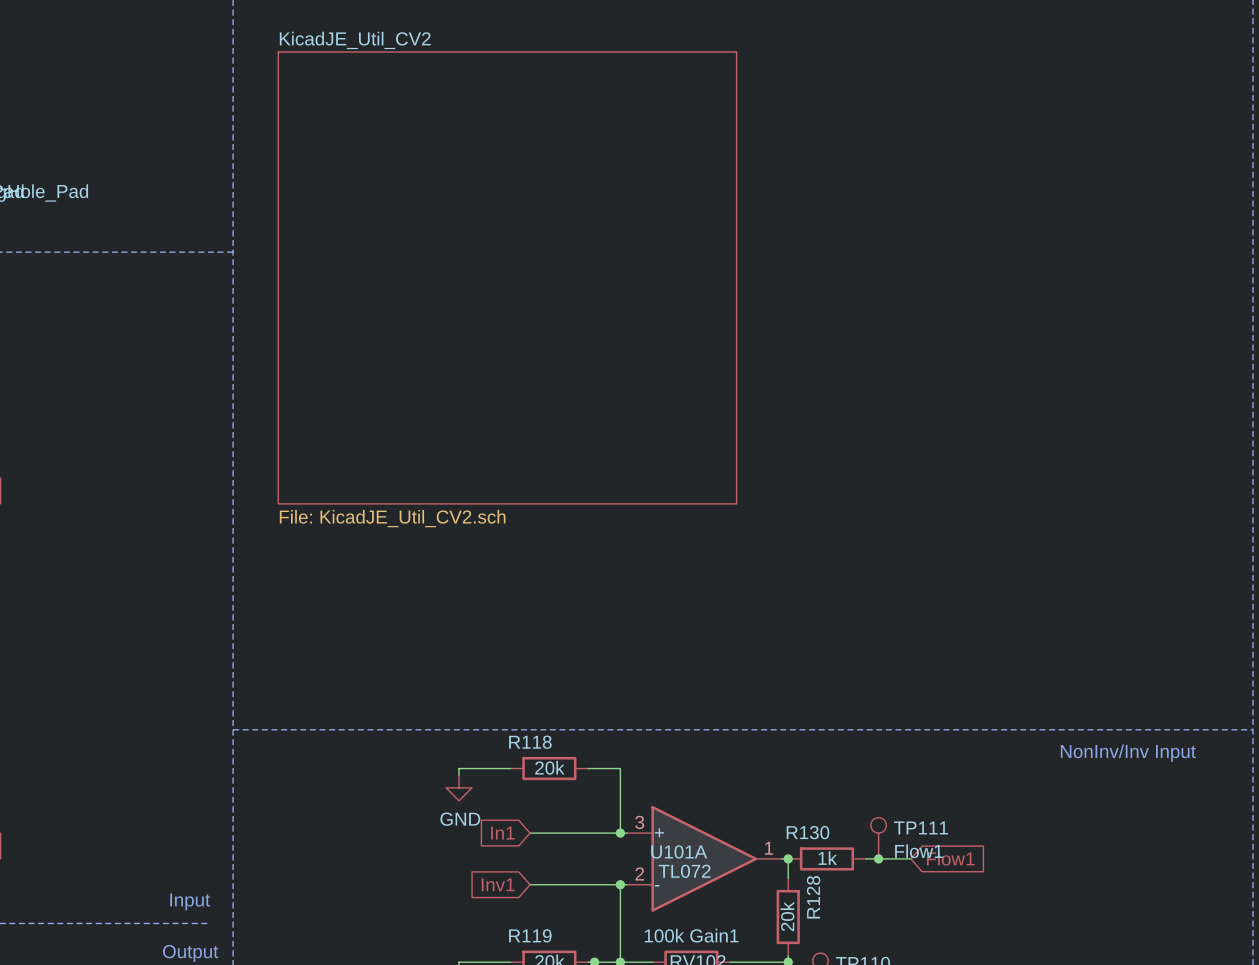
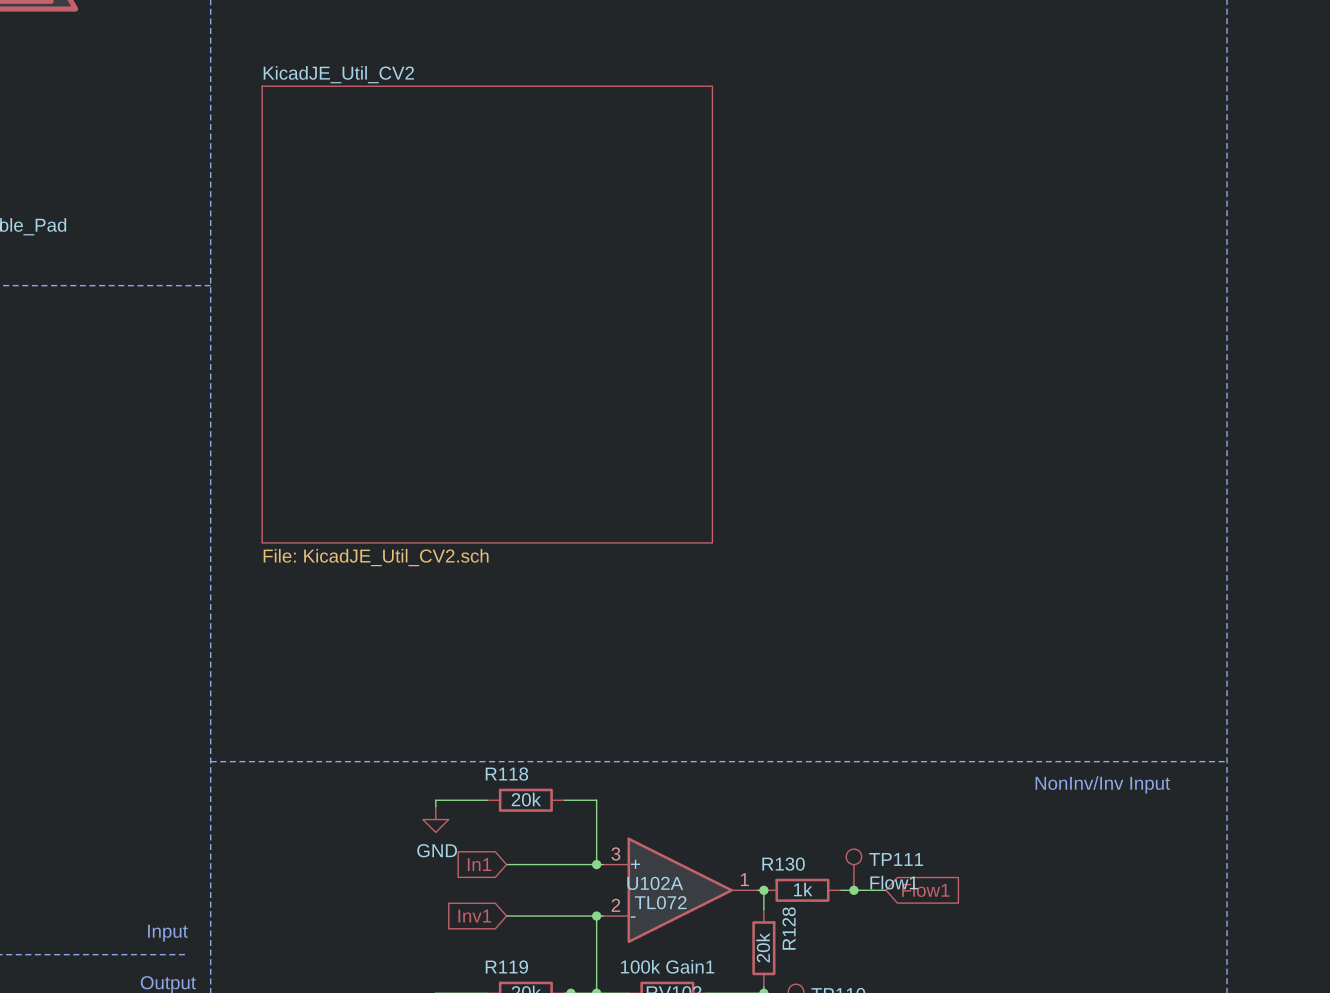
sheet KicadJE_Util_CV2 rotation: 0° (507, 277) -> 90° clockwise (487, 314)
U101A name: U101A (679, 851) -> U102A (655, 883)

